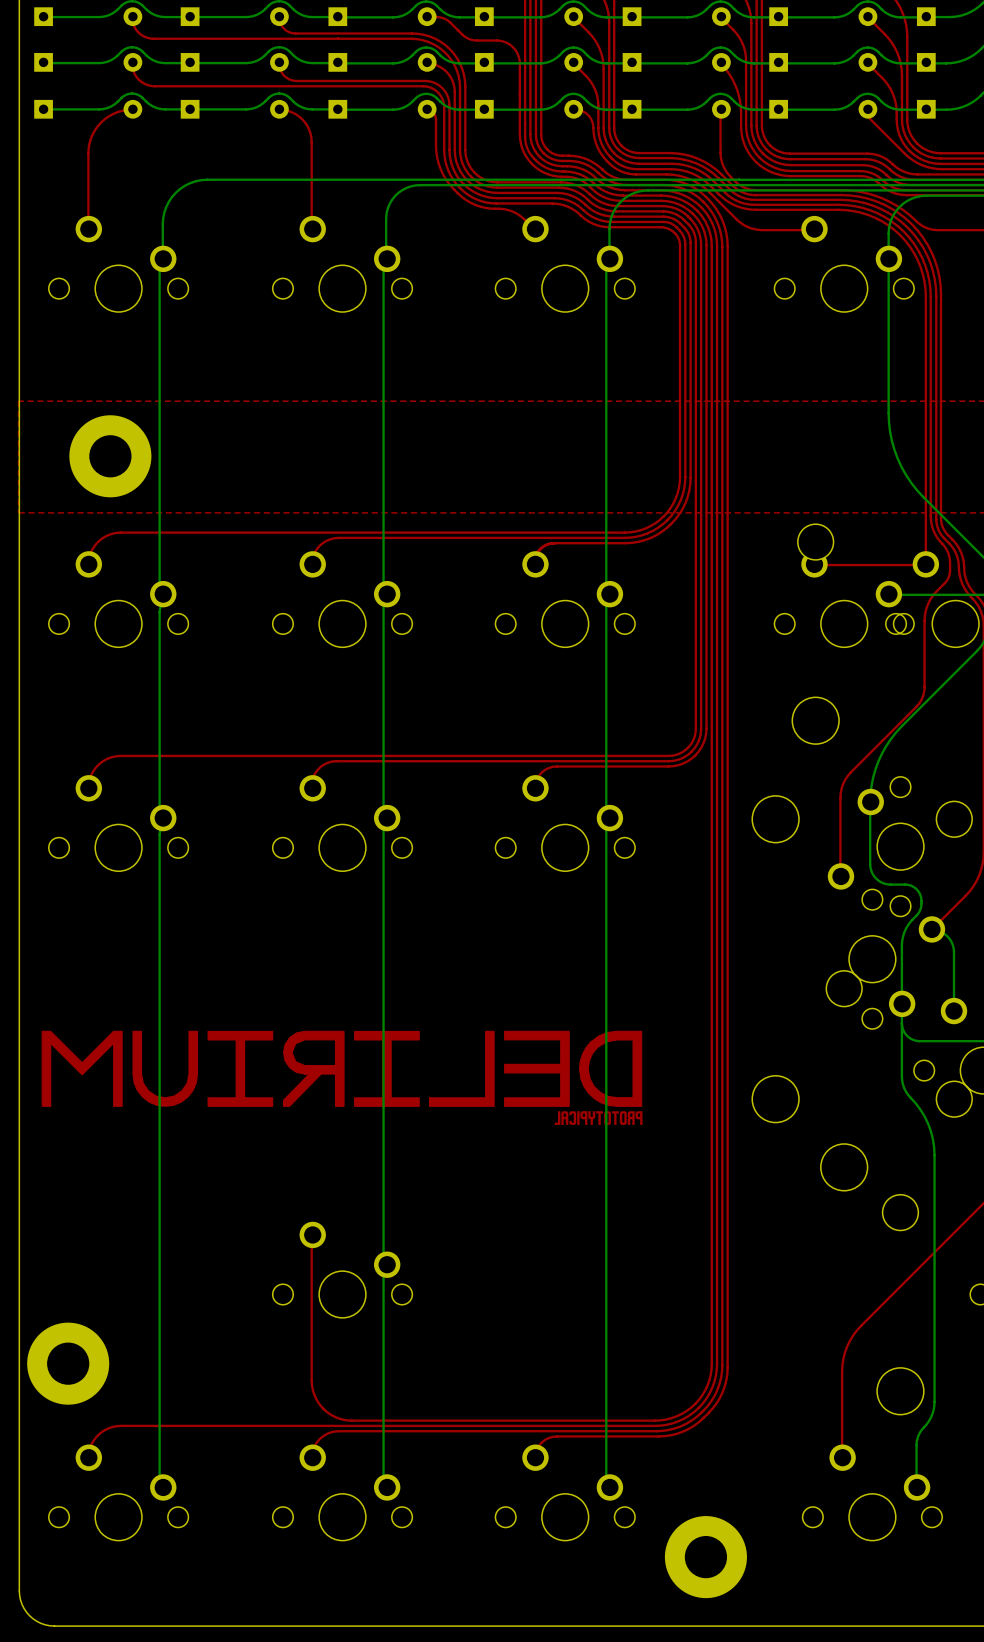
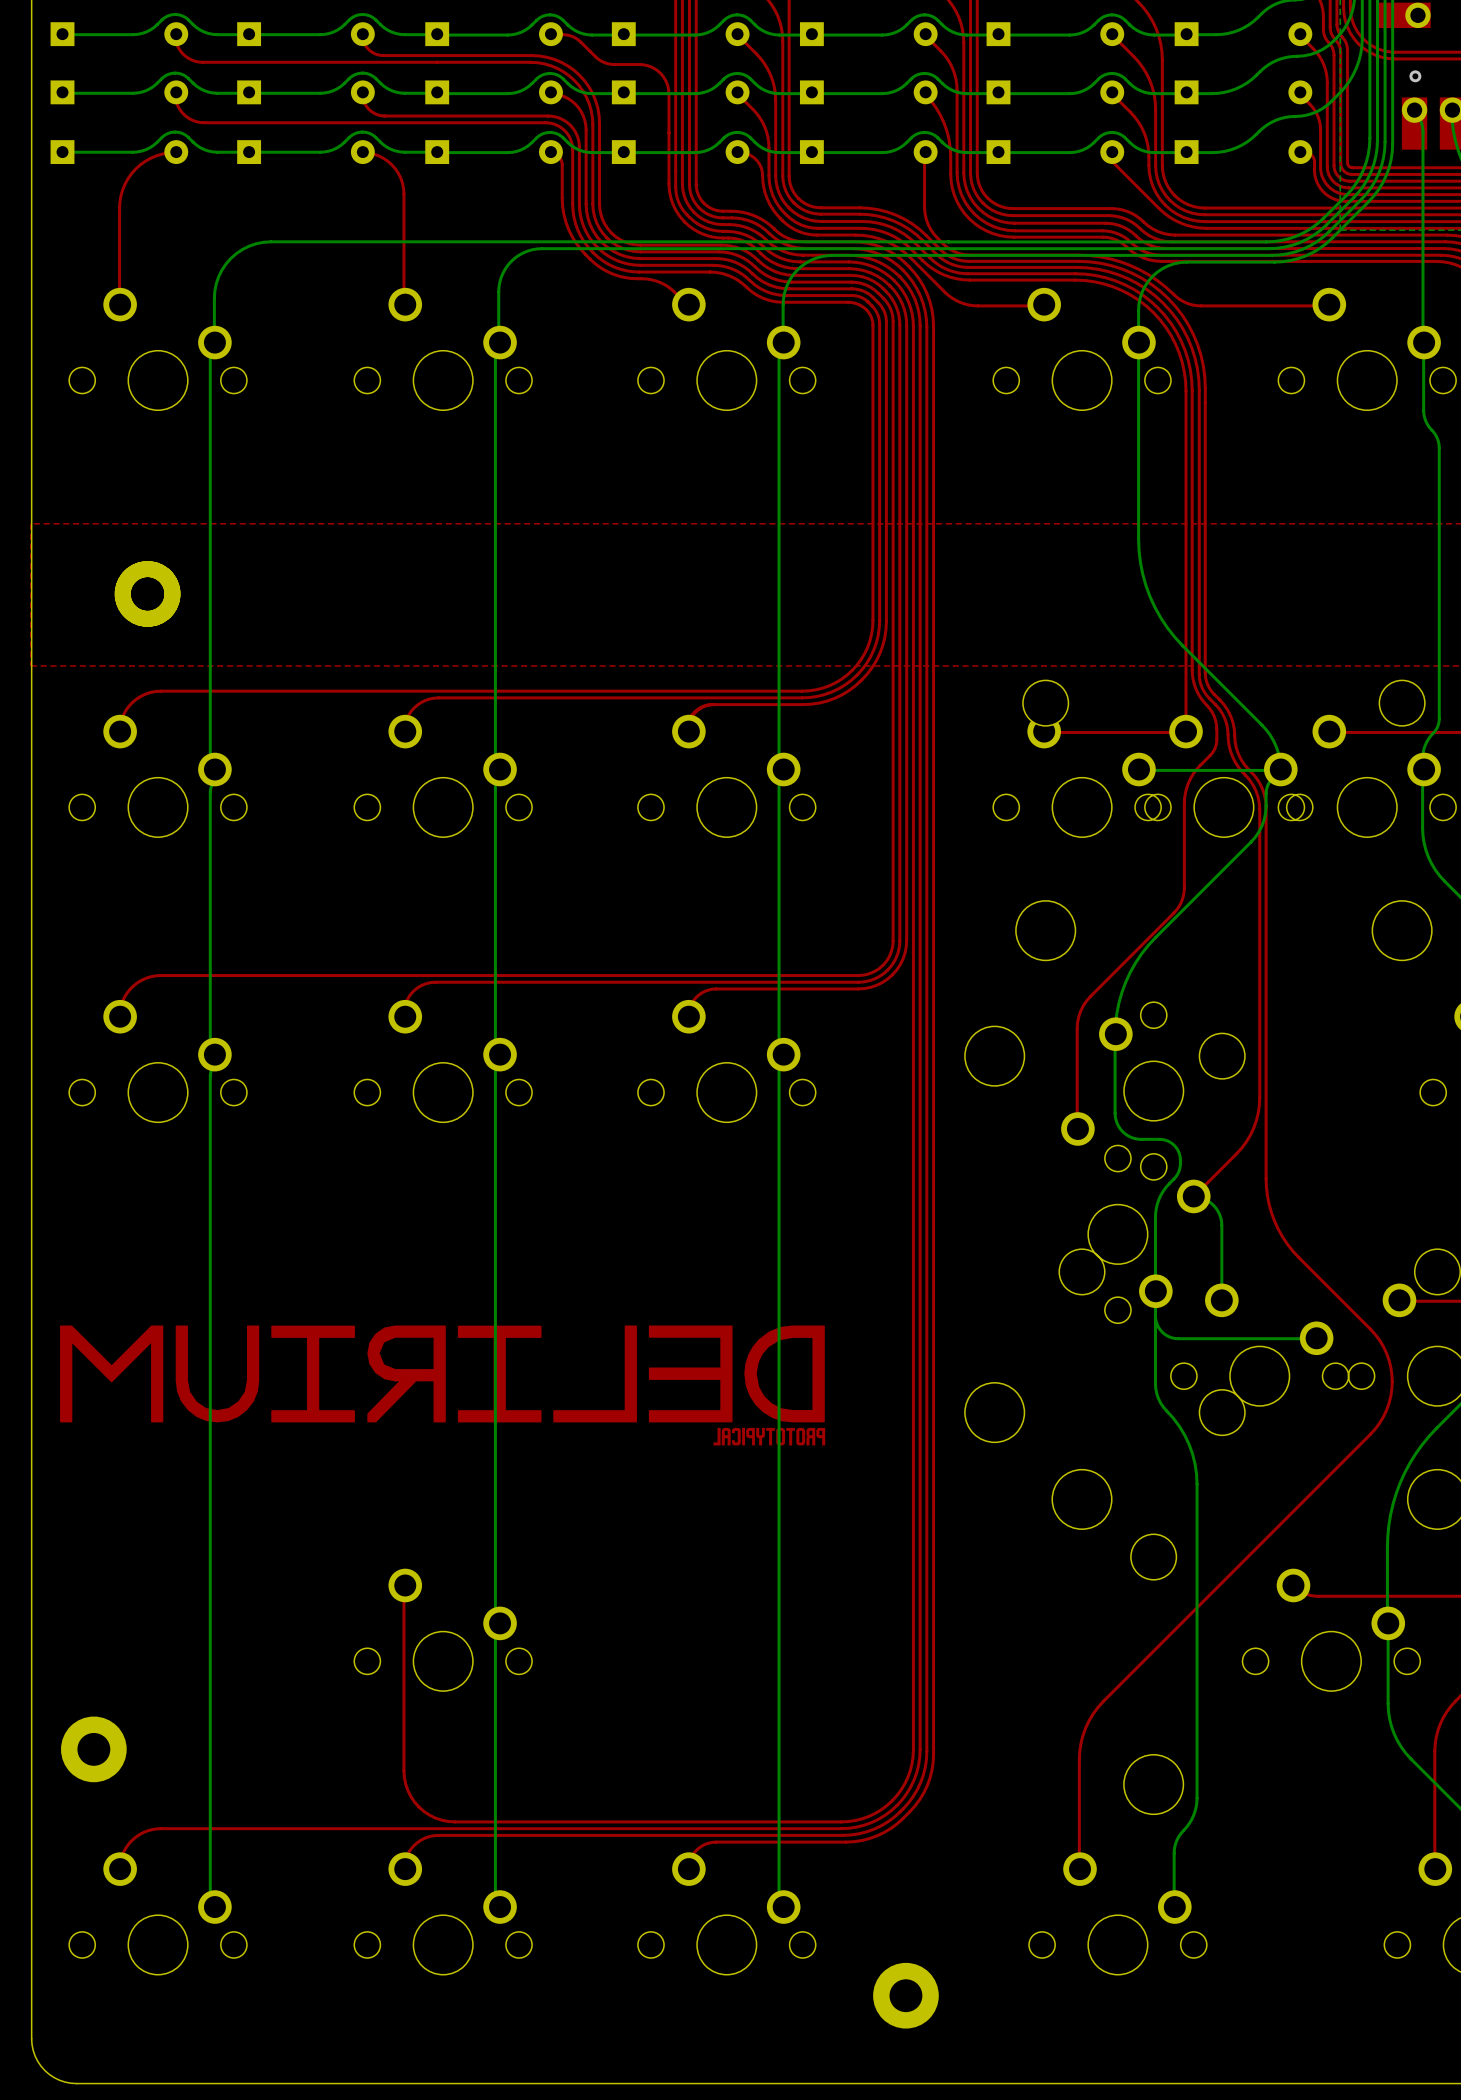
part footprint: [69, 415, 152, 498] -> [114, 561, 181, 627]
part footprint: [27, 1322, 110, 1405] -> [61, 1716, 127, 1783]
part footprint: [664, 1516, 747, 1599] -> [873, 1962, 939, 2029]

